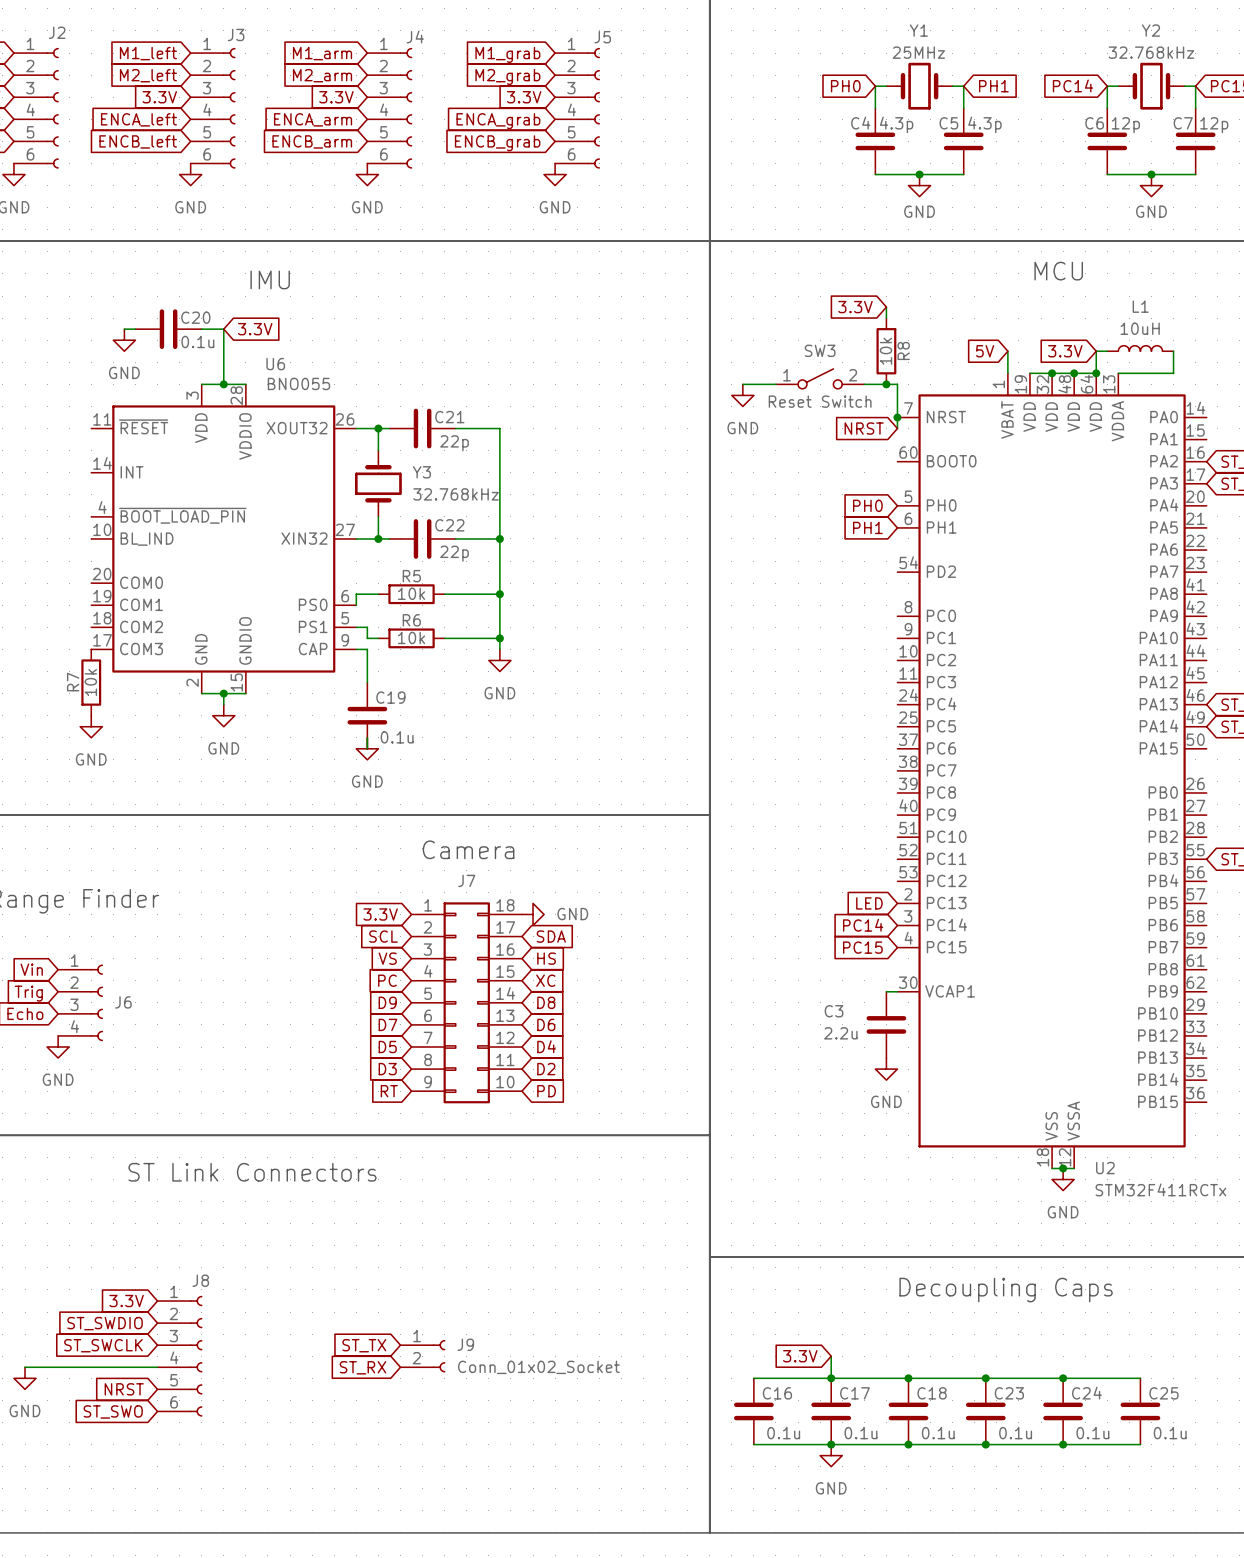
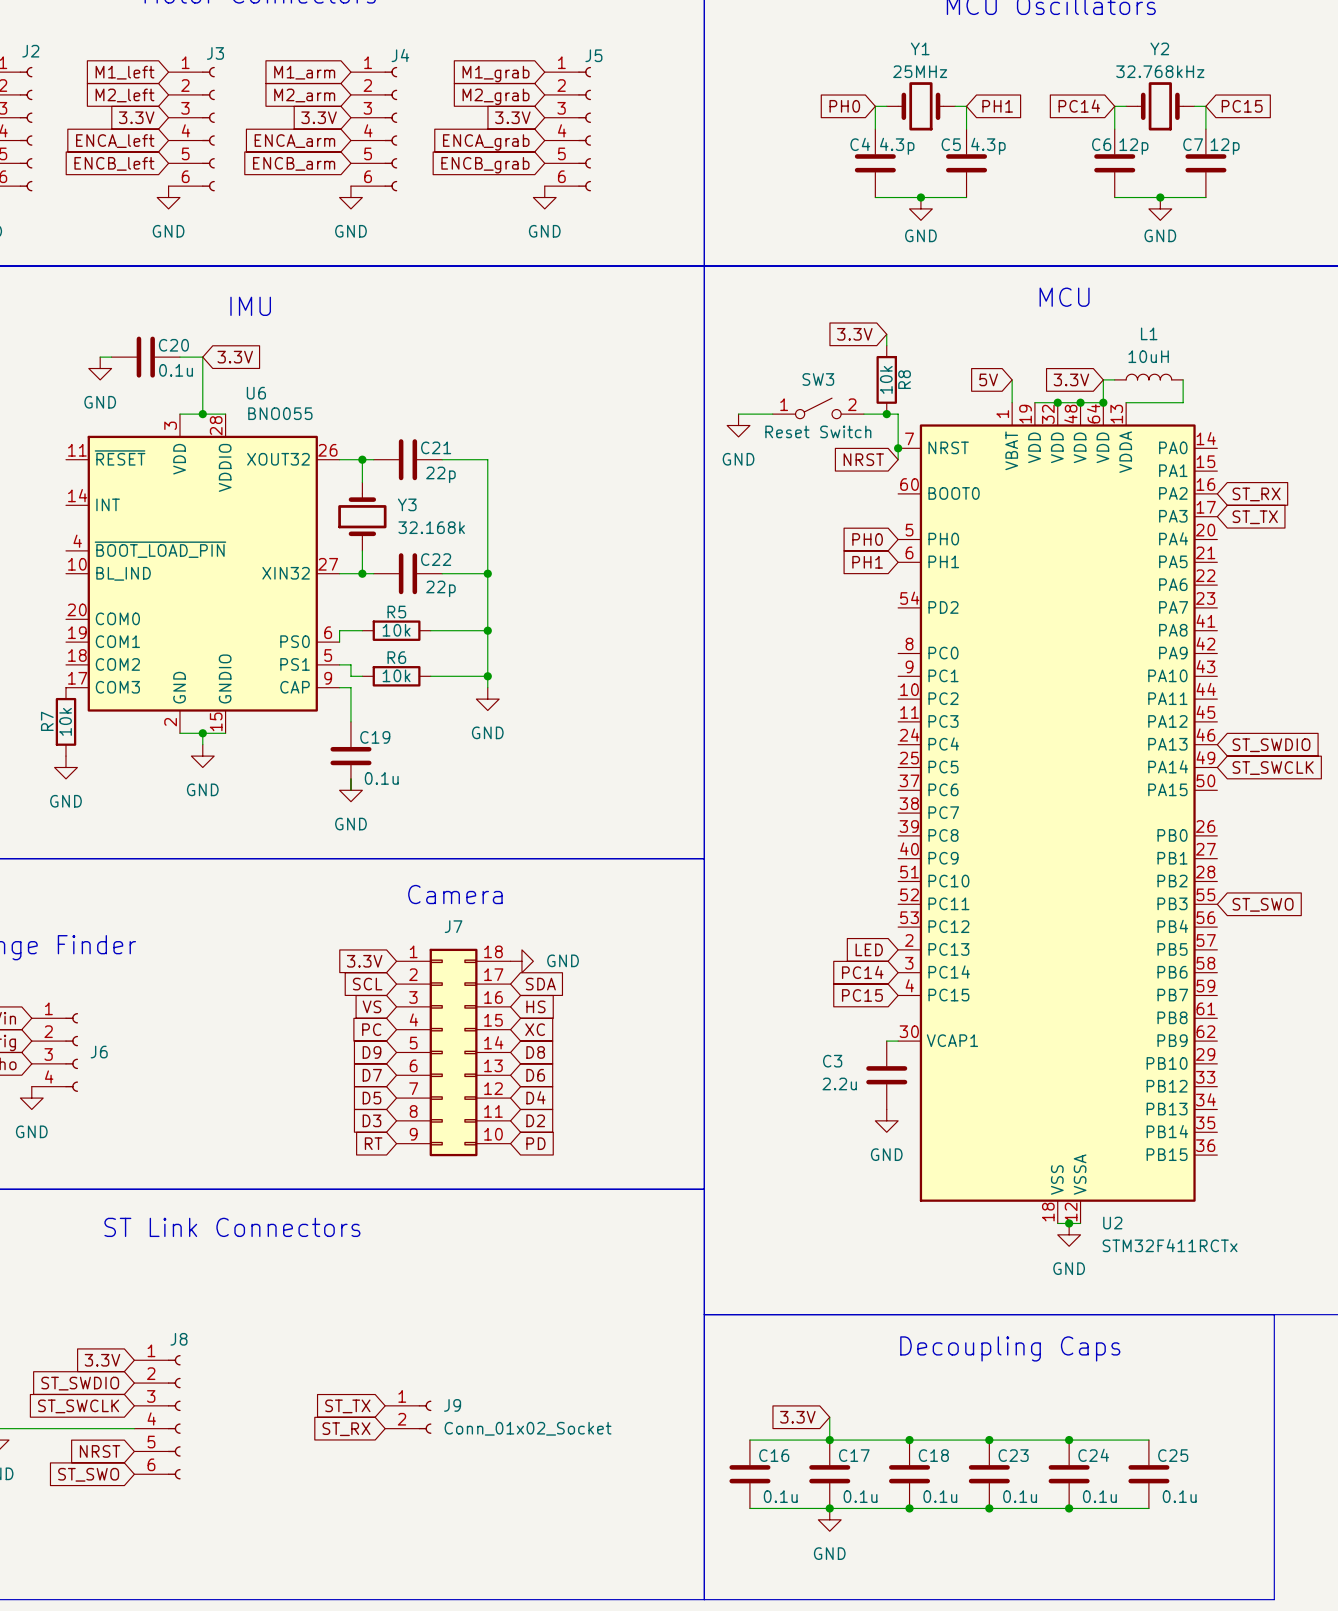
Y3 value: 32.768kHz (456, 494) -> 32.168k (431, 527)

